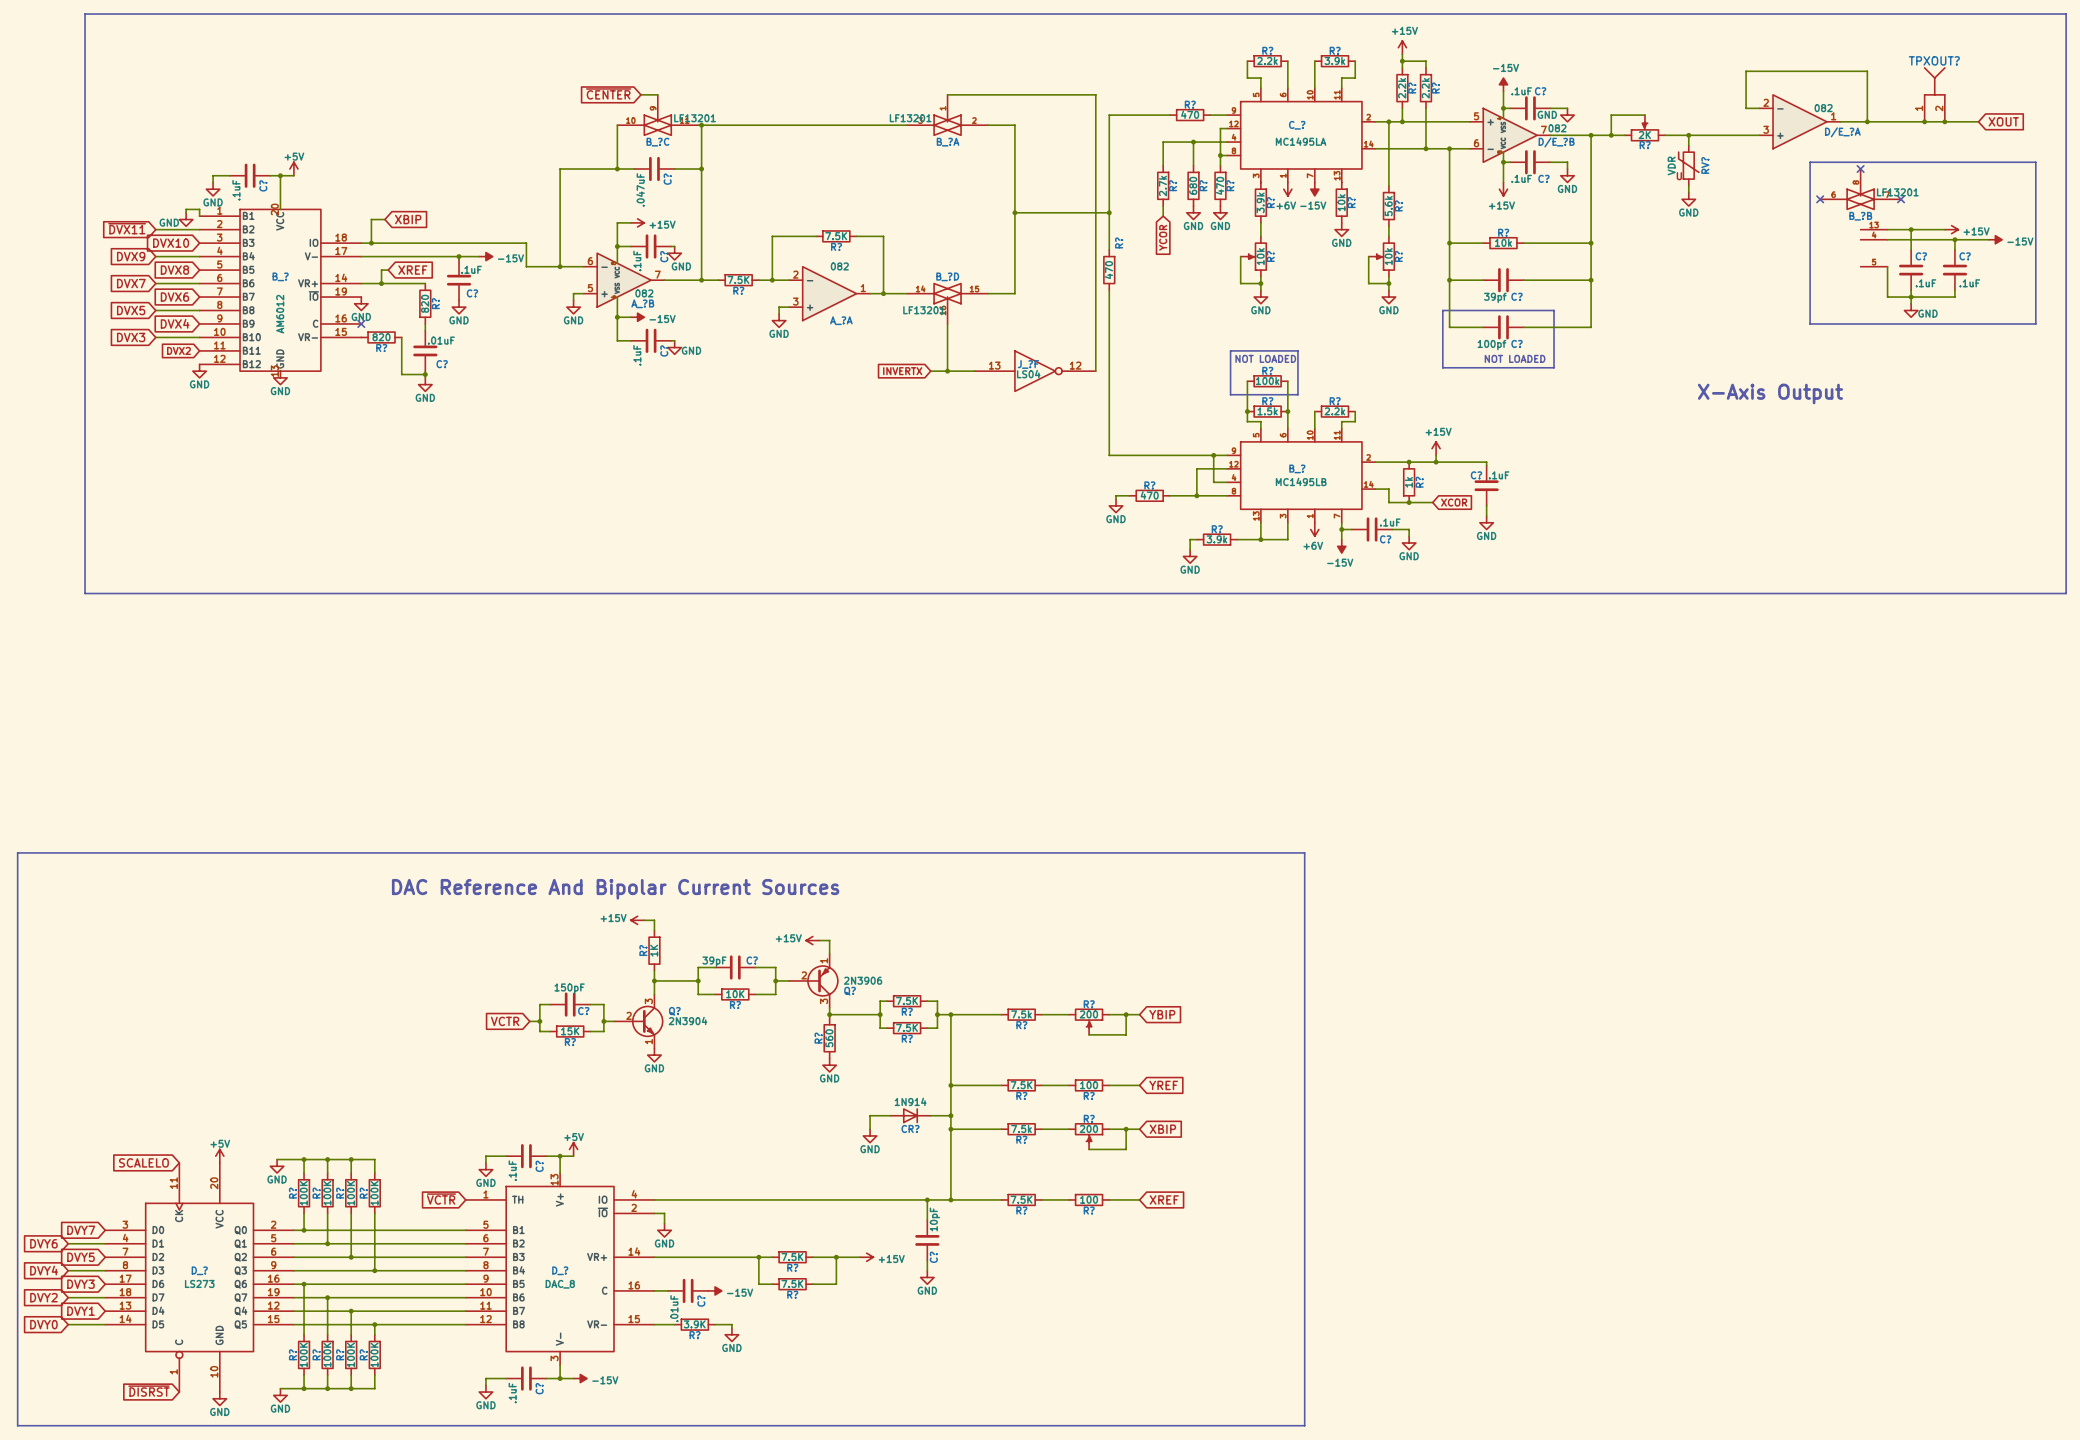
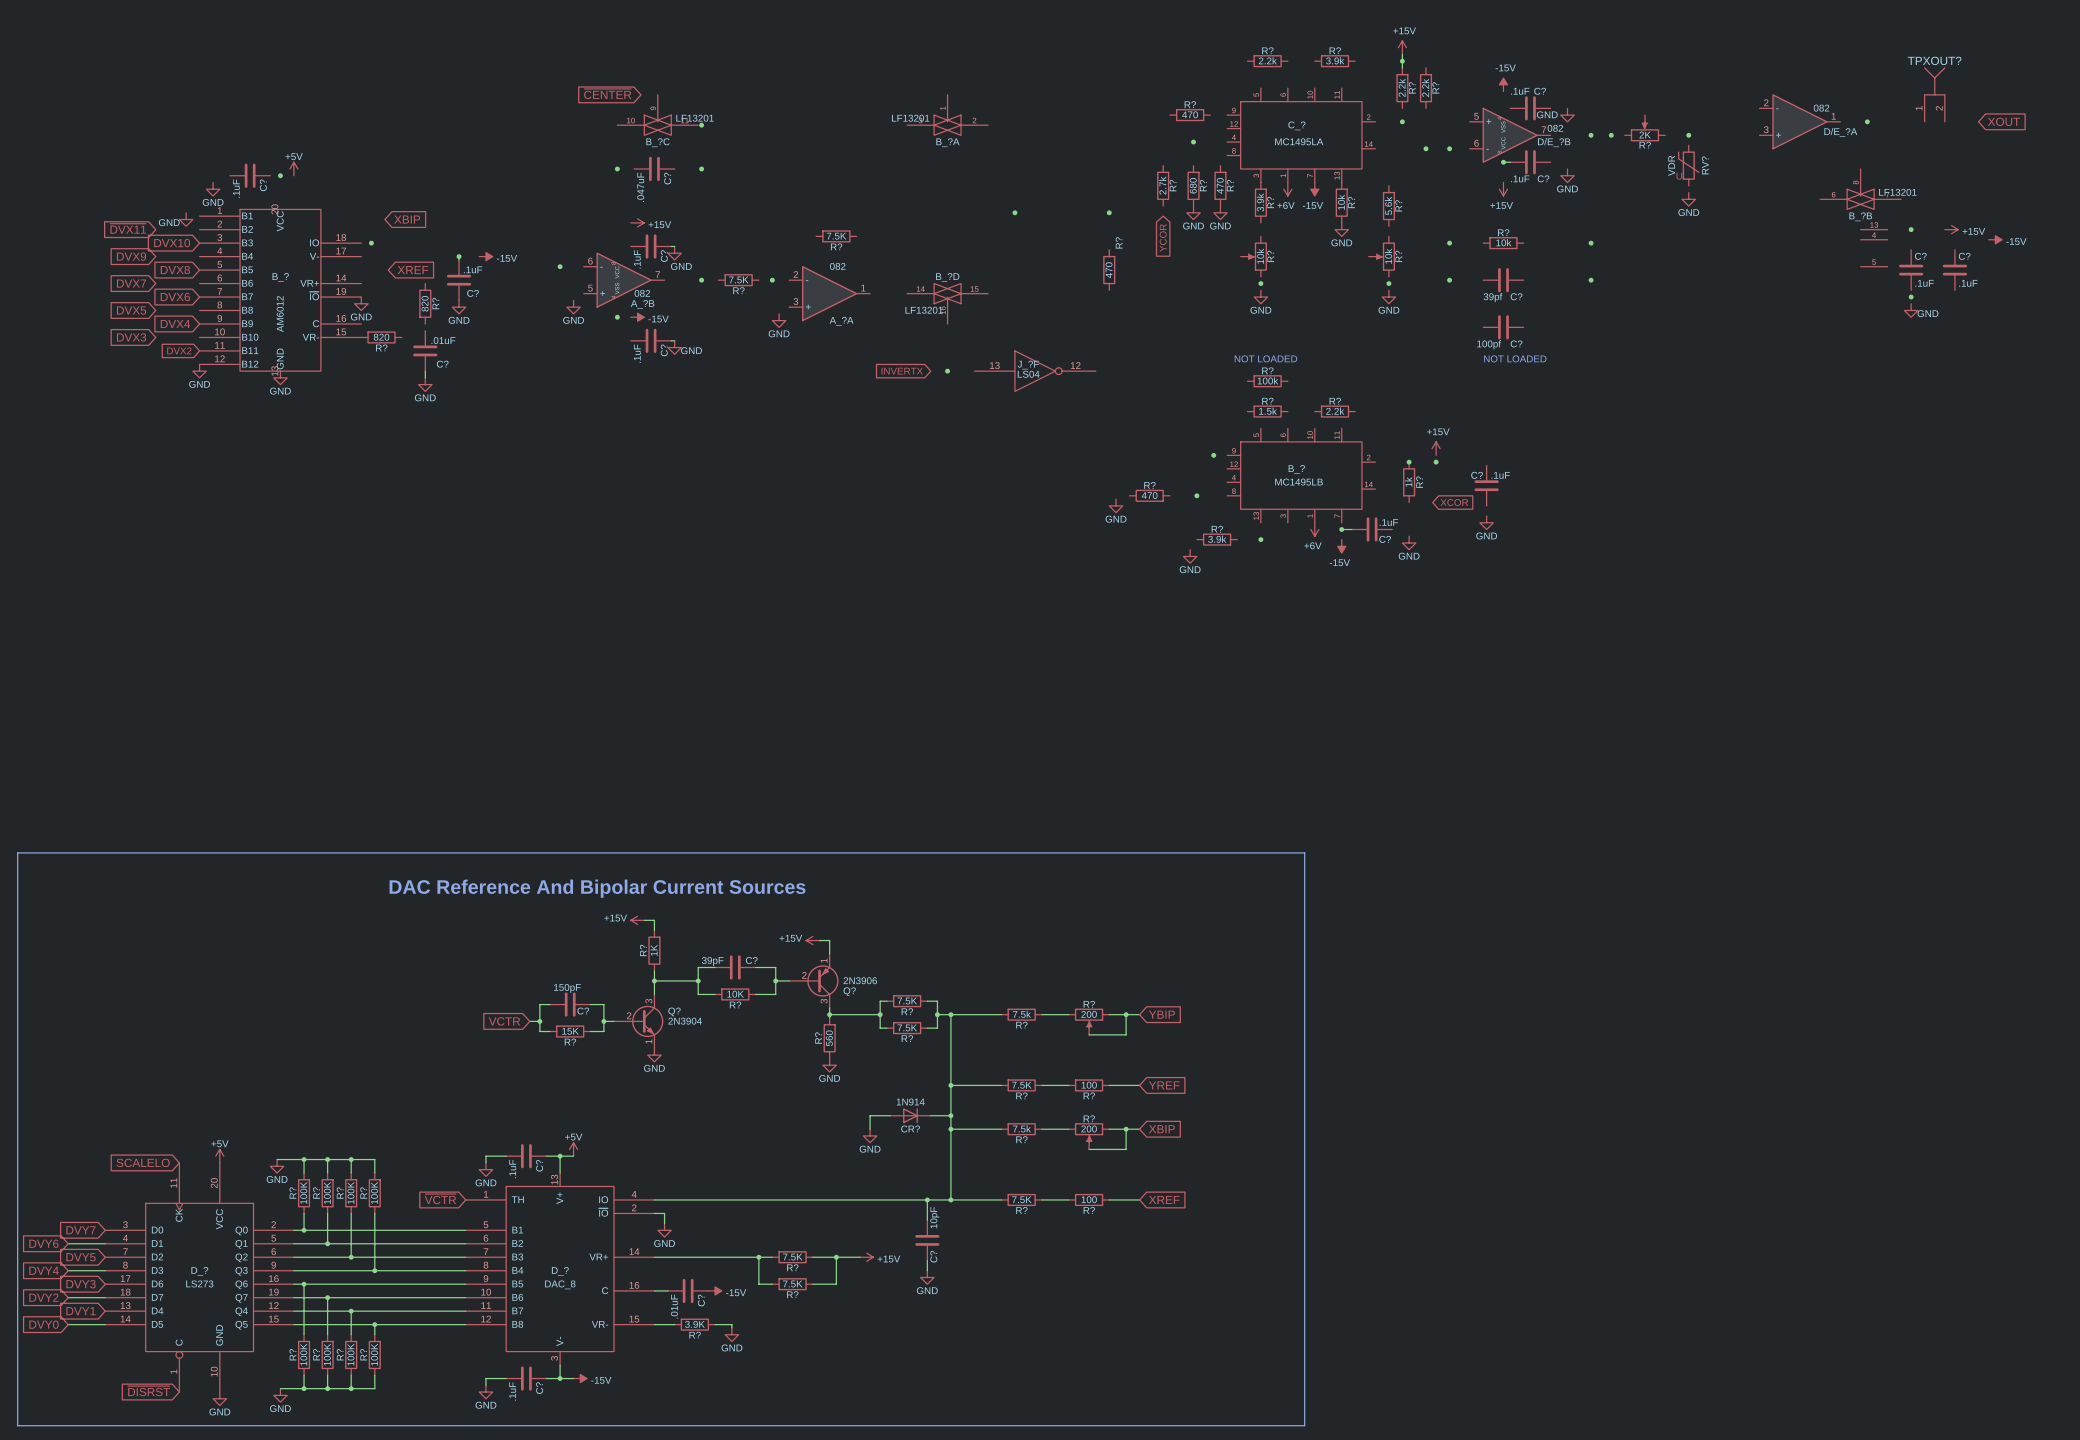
line: (85, 14) (2066, 14) (2066, 593) (85, 593) (85, 14) -> none
wire: (1247, 61) (1247, 78) (1260, 78) (1260, 88) -> none
wire: (1287, 61) (1287, 88) -> none
wire: (1314, 61) (1314, 88) -> none
wire: (1355, 61) (1355, 78) (1341, 78) (1341, 88) -> none
wire: (1402, 61) (1425, 61) (1425, 67) -> none
wire: (1503, 91) (1503, 118) -> none
wire: (640, 94) (657, 94) -> none
wire: (947, 94) (1095, 94) (1095, 371) -> none
wire: (1402, 108) (1402, 121) -> none
wire: (1425, 108) (1425, 148) -> none
wire: (1503, 108) (1510, 108) -> none
junction: (1503, 108) -> none
wire: (1550, 108) (1567, 108) -> none
wire: (1759, 108) (1746, 108) (1746, 71) (1867, 71) (1867, 121) -> none
wire: (1169, 115) (1109, 115) (1109, 249) -> none
wire: (1210, 115) (1227, 115) -> none
wire: (1644, 115) (1611, 115) (1611, 135) -> none
wire: (1375, 121) (1469, 121) -> none
wire: (1388, 121) (1388, 185) -> none
junction: (1388, 121) -> none
wire: (1840, 121) (1978, 121) -> none
junction: (1924, 121) -> none
junction: (1944, 121) -> none
wire: (617, 125) (617, 169) -> none
wire: (698, 125) (907, 125) -> none
wire: (701, 125) (701, 280) -> none
wire: (987, 125) (1014, 125) (1014, 293) (987, 293) -> none
wire: (1227, 128) (1220, 128) (1220, 165) -> none
wire: (1550, 135) (1624, 135) -> none
wire: (1591, 135) (1591, 327) (1523, 327) -> none
wire: (1665, 135) (1759, 135) -> none
wire: (1688, 135) (1688, 145) -> none
wire: (1193, 142) (1193, 165) -> none
wire: (1227, 142) (1163, 142) (1163, 165) -> none
wire: (1375, 148) (1469, 148) -> none
wire: (1449, 148) (1449, 327) (1483, 327) -> none
wire: (1503, 152) (1503, 182) -> none
wire: (1220, 155) (1227, 155) -> none
junction: (1220, 155) -> none
wire: (1550, 162) (1567, 162) (1567, 169) -> none
line: (1810, 162) (1810, 323) (2035, 323) (2035, 162) (1810, 162) -> none
wire: (634, 169) (560, 169) (560, 266) -> none
wire: (674, 169) (701, 169) -> none
no-connect mark: (1860, 169) -> none
wire: (229, 175) (213, 175) (213, 182) -> none
wire: (270, 175) (293, 175) -> none
wire: (280, 175) (280, 209) -> none
wire: (1688, 185) (1688, 192) -> none
no-connect mark: (1820, 199) -> none
no-connect mark: (1901, 199) -> none
wire: (1163, 206) (1163, 216) -> none
wire: (186, 212) (186, 209) (199, 209) (199, 216) -> none
wire: (1014, 212) (1109, 212) -> none
wire: (384, 219) (371, 219) (371, 243) -> none
wire: (630, 222) (617, 222) (617, 263) -> none
wire: (1260, 222) (1260, 236) -> none
wire: (1388, 226) (1388, 236) -> none
wire: (155, 229) (199, 229) -> none
wire: (1887, 229) (1944, 229) -> none
wire: (1911, 229) (1911, 249) -> none
wire: (816, 236) (772, 236) (772, 280) -> none
wire: (856, 236) (883, 236) (883, 293) -> none
wire: (1887, 239) (1988, 239) -> none
wire: (1954, 239) (1954, 249) -> none
junction: (1954, 239) -> none
wire: (361, 243) (526, 243) (526, 266) (583, 266) -> none
wire: (1449, 243) (1483, 243) -> none
wire: (1523, 243) (1591, 243) -> none
wire: (617, 246) (630, 246) -> none
junction: (617, 246) -> none
wire: (155, 256) (199, 256) -> none
wire: (361, 256) (479, 256) -> none
wire: (1240, 256) (1240, 283) (1260, 283) -> none
wire: (1368, 256) (1368, 283) (1388, 283) -> none
wire: (1887, 266) (1887, 297) (1954, 297) (1954, 290) -> none
wire: (388, 270) (381, 270) (381, 283) -> none
wire: (1260, 276) (1260, 290) -> none
wire: (1388, 276) (1388, 290) -> none
wire: (664, 280) (718, 280) -> none
wire: (758, 280) (789, 280) -> none
wire: (1449, 280) (1483, 280) -> none
wire: (1523, 280) (1591, 280) -> none
wire: (155, 283) (199, 283) -> none
wire: (361, 283) (425, 283) -> none
junction: (381, 283) -> none
wire: (1109, 290) (1109, 455) (1227, 455) -> none
wire: (1911, 290) (1911, 303) -> none
wire: (583, 293) (573, 293) (573, 300) -> none
wire: (870, 293) (907, 293) -> none
junction: (883, 293) -> none
wire: (617, 297) (617, 340) (630, 340) -> none
wire: (789, 307) (779, 307) (779, 313) -> none
wire: (155, 310) (199, 310) -> none
line: (1442, 310) (1442, 367) (1554, 367) (1554, 310) (1442, 310) -> none
wire: (617, 317) (630, 317) -> none
no-connect mark: (361, 323) -> none
wire: (425, 323) (425, 330) -> none
wire: (947, 323) (947, 371) -> none
wire: (155, 337) (199, 337) -> none
wire: (401, 337) (401, 374) (425, 374) -> none
line: (1230, 350) (1230, 394) (1297, 394) (1297, 350) (1230, 350) -> none
wire: (930, 371) (974, 371) -> none
junction: (425, 374) -> none
wire: (1247, 381) (1247, 421) (1260, 421) (1260, 428) -> none
wire: (1287, 381) (1287, 428) -> none
text: X-Axis Output (1770, 394) -> none
junction: (1247, 411) -> none
junction: (1287, 411) -> none
wire: (1314, 411) (1314, 428) -> none
wire: (1355, 411) (1355, 421) (1341, 421) (1341, 428) -> none
wire: (1213, 455) (1213, 482) (1227, 482) -> none
wire: (1436, 455) (1436, 462) -> none
wire: (1375, 462) (1486, 462) (1486, 465) -> none
wire: (1227, 468) (1196, 468) (1196, 495) -> none
wire: (1375, 489) (1388, 489) (1388, 502) (1432, 502) -> none
wire: (1129, 495) (1116, 495) (1116, 499) -> none
wire: (1169, 495) (1227, 495) -> none
junction: (1409, 502) -> none
wire: (1486, 505) (1486, 516) -> none
wire: (1260, 522) (1260, 539) -> none
wire: (1287, 522) (1287, 539) (1237, 539) -> none
wire: (1341, 522) (1341, 539) -> none
wire: (1392, 529) (1409, 529) (1409, 536) -> none
wire: (1196, 539) (1190, 539) (1190, 549) -> none

